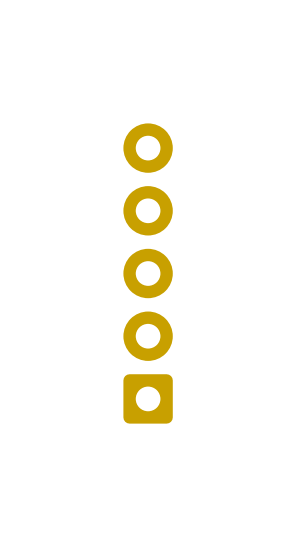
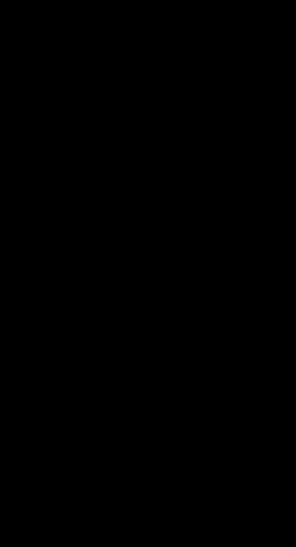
part: (148, 273) -> none

